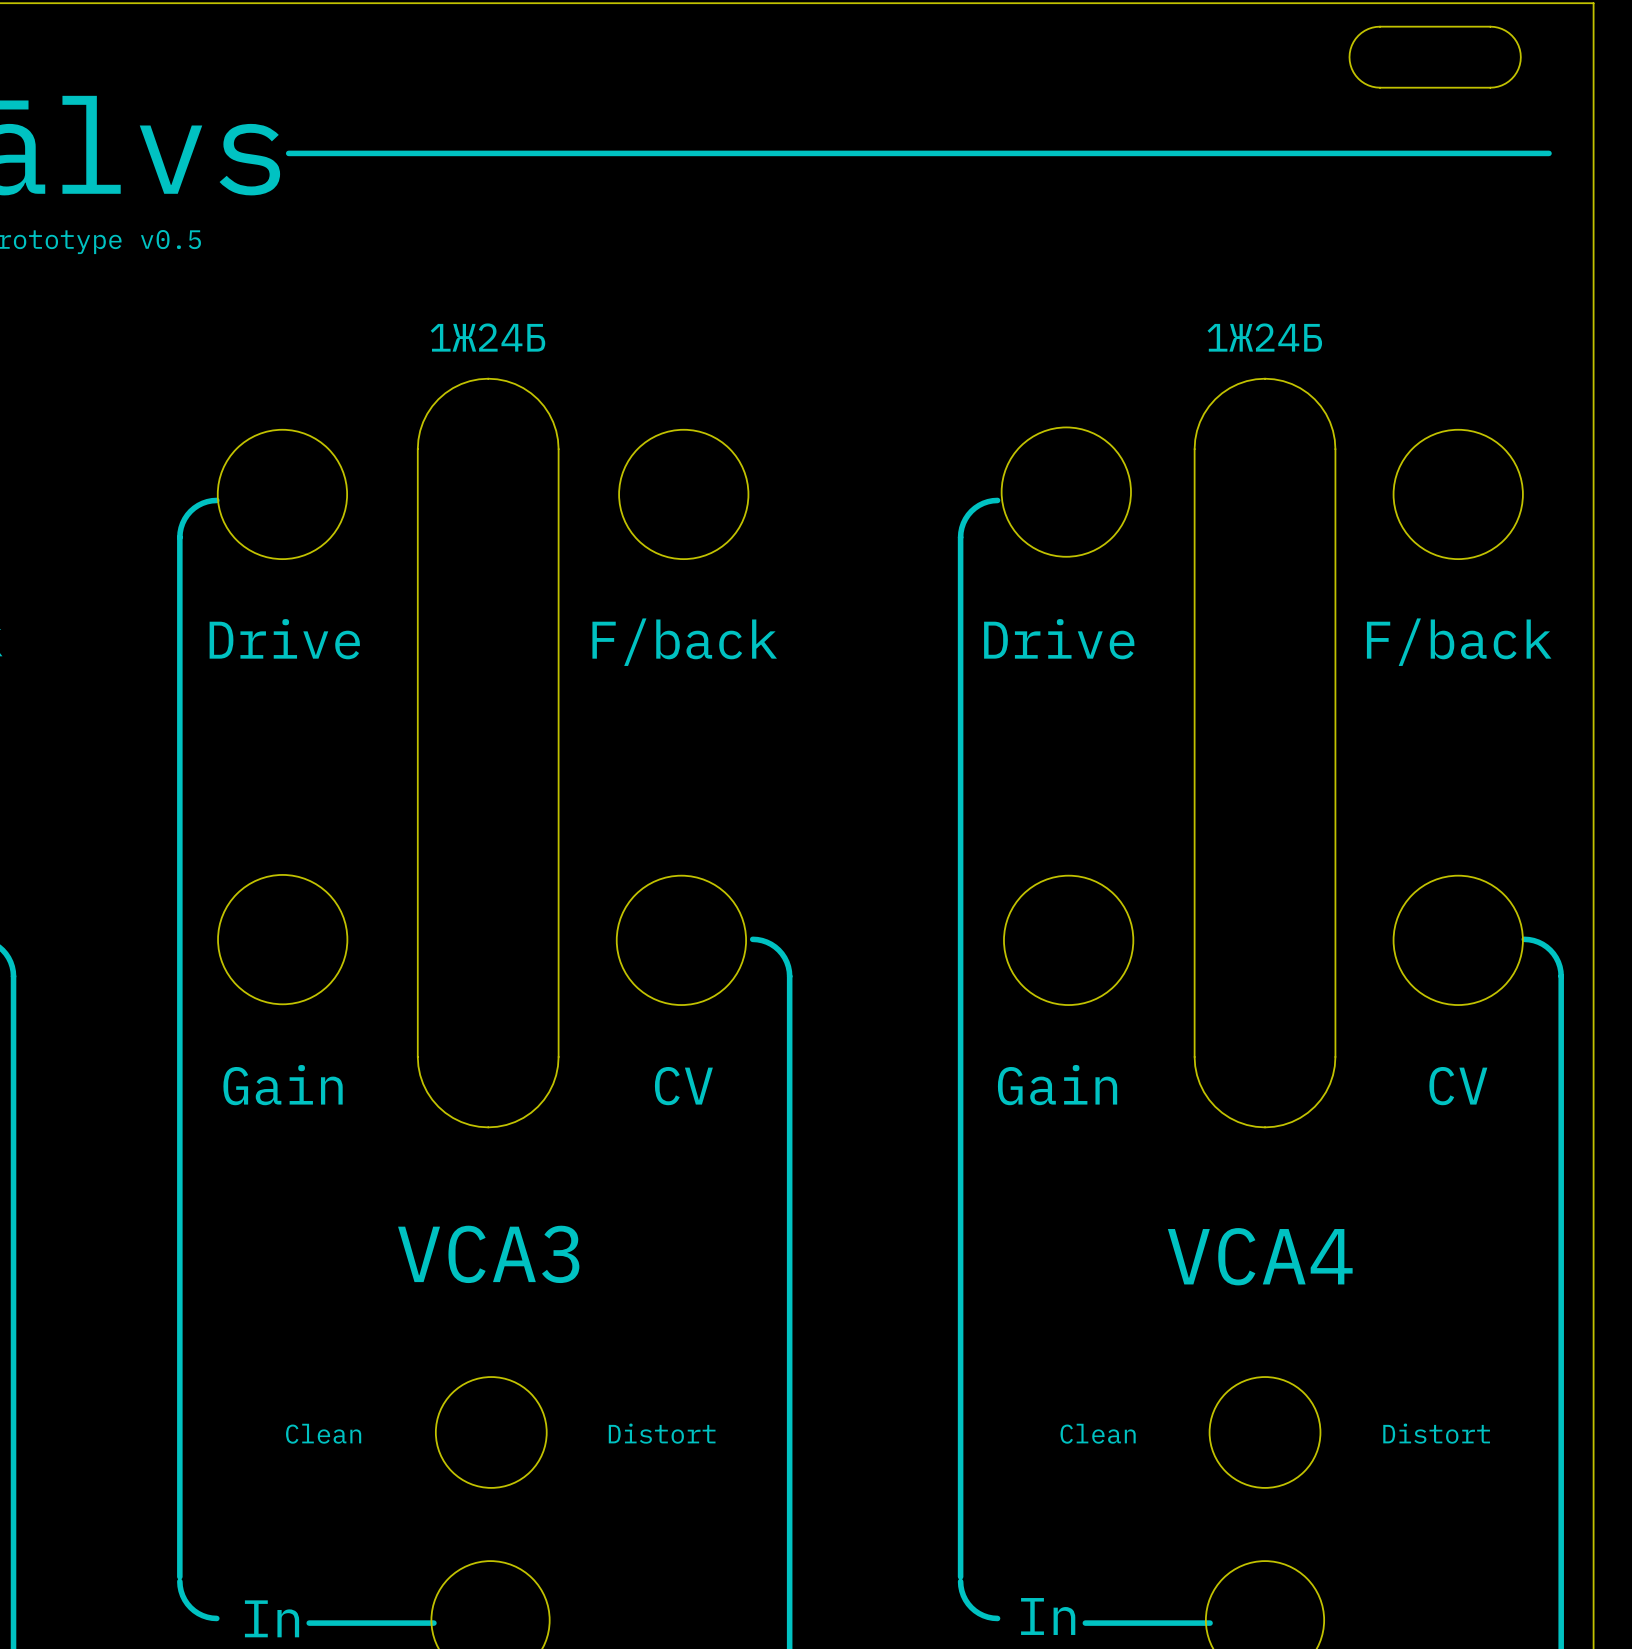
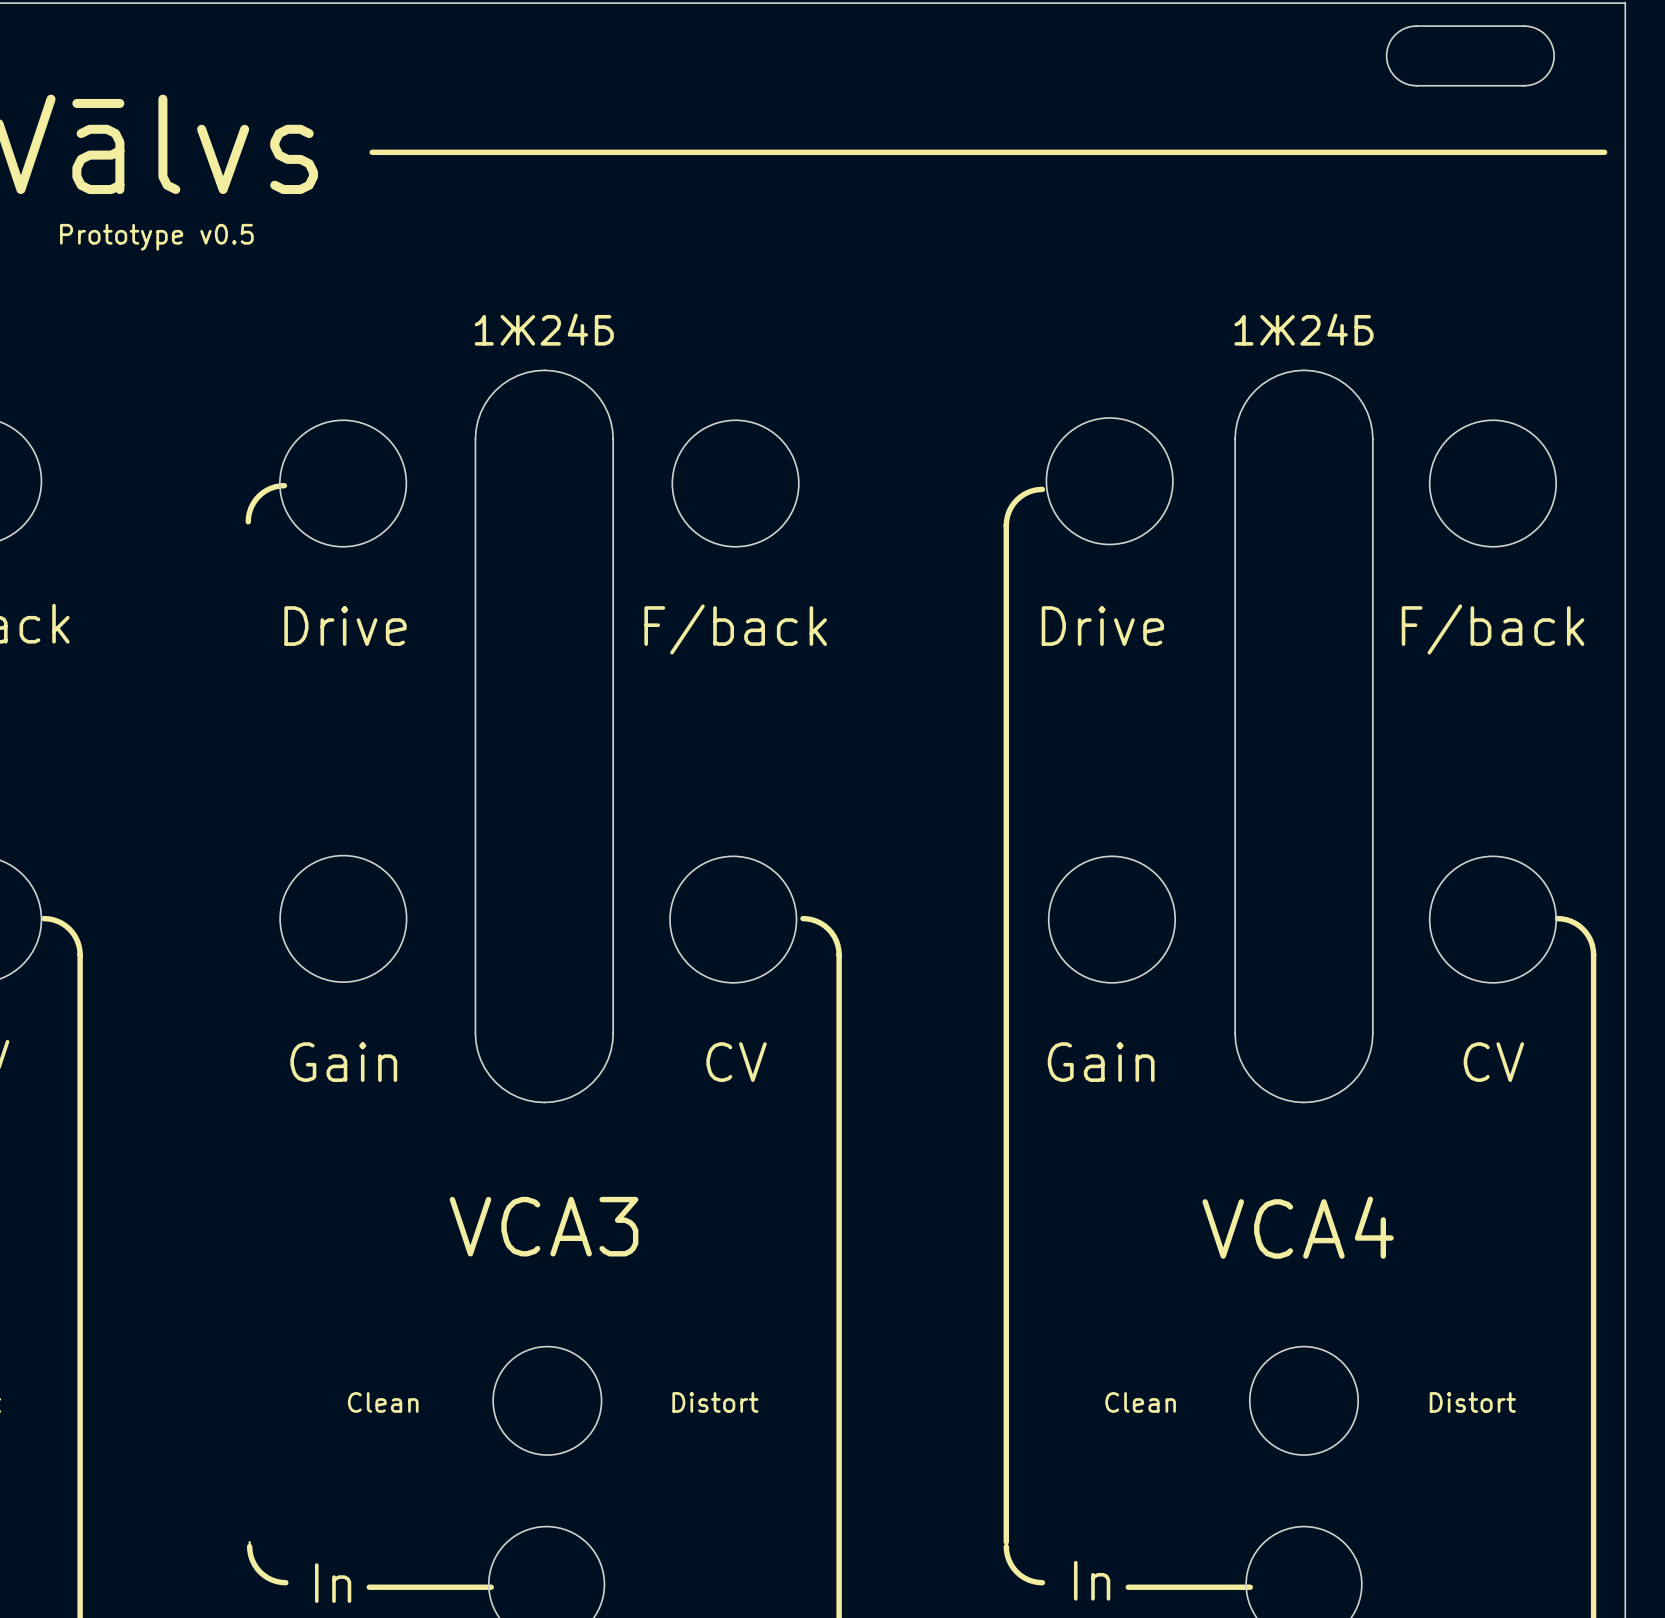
line: (288, 153) (1549, 153) -> (372, 152) (1604, 152)
line: none -> (284, 485) (270, 488) (258, 496) (251, 507) (248, 521)
line: (216, 500) (202, 503) (190, 511) (182, 523) (179, 537) (179, 1581) (182, 1595) (190, 1607) (202, 1615) (216, 1618) -> none
line: none -> (249, 1542) (252, 1560) (260, 1572) (271, 1579) (285, 1582)

